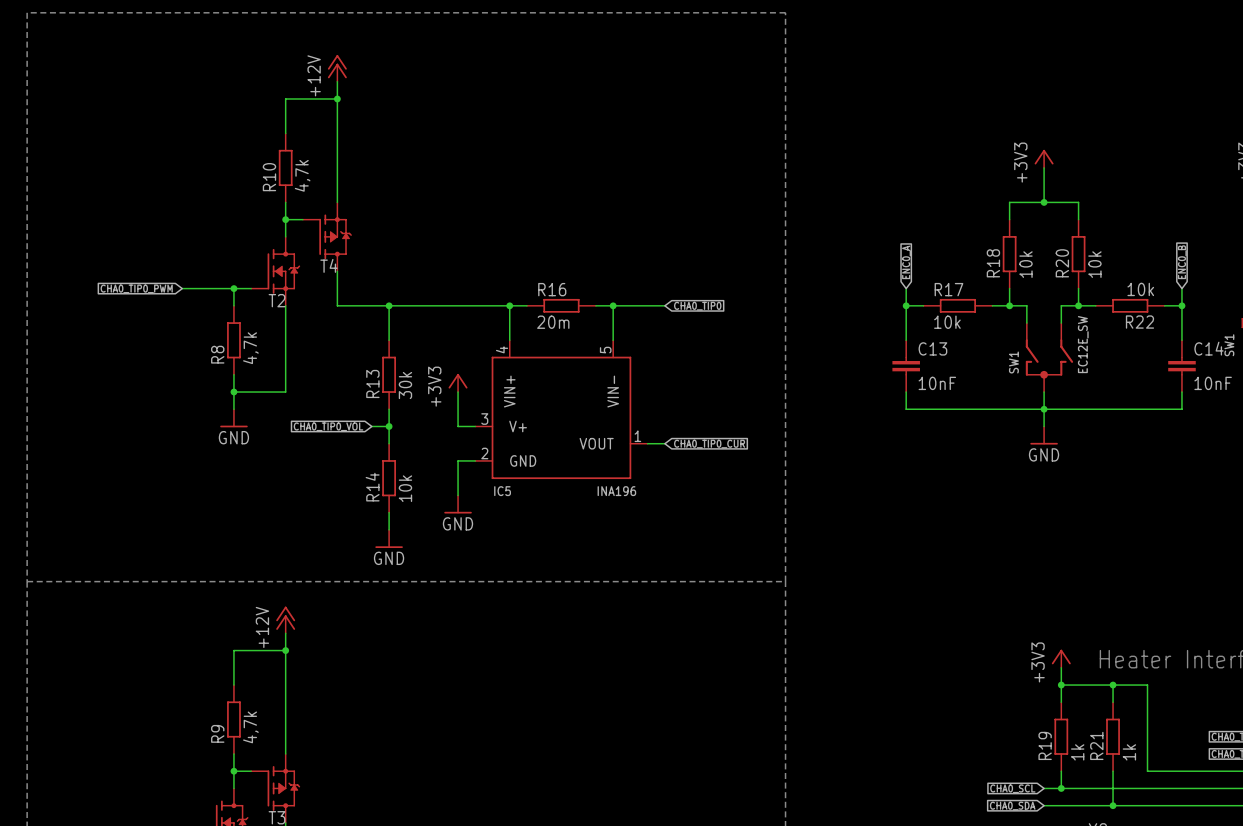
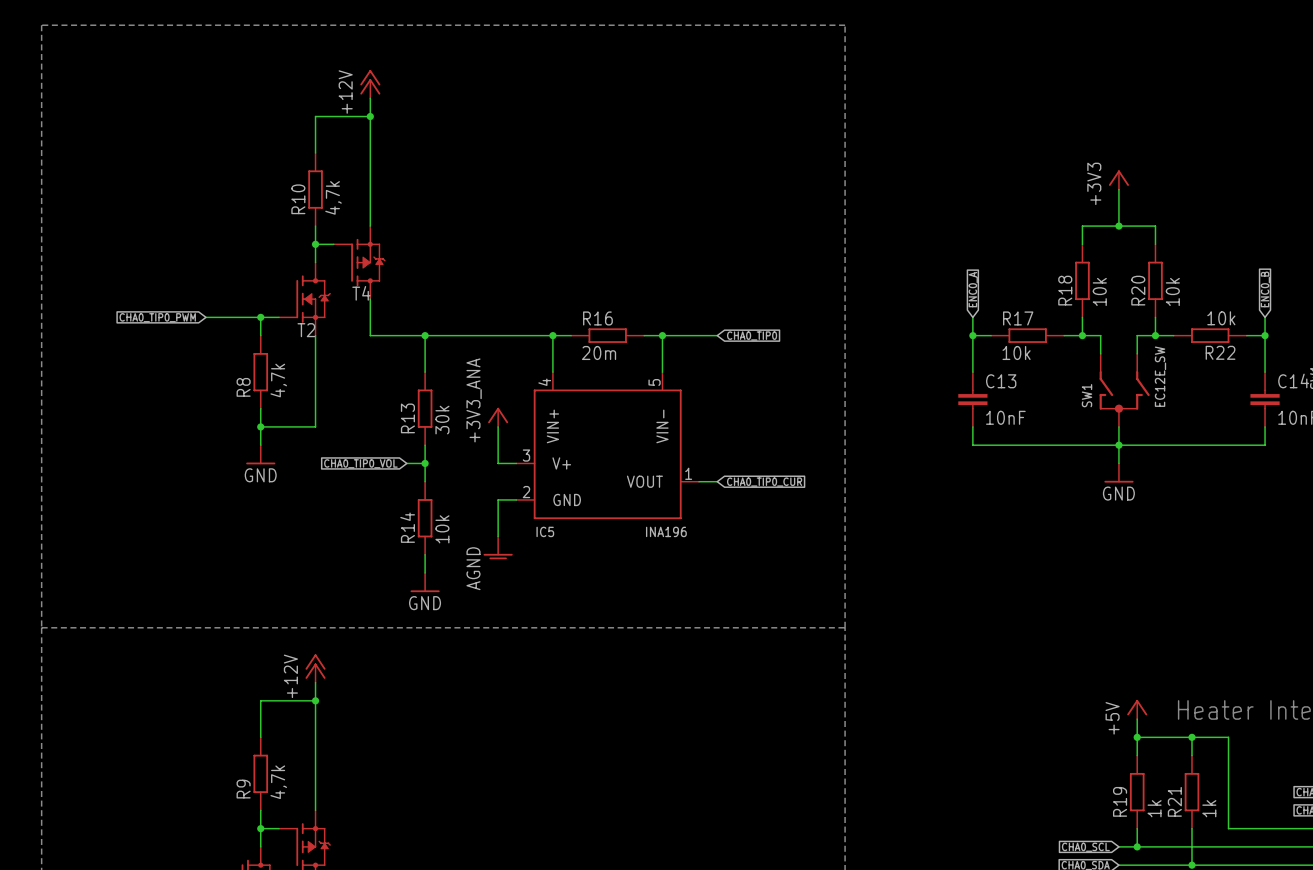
power symbol: +3V3 (458, 382) -> +3V3_ANA (498, 417)
power symbol: GND (458, 504) -> AGND (498, 547)
power symbol: +3V3 (1061, 658) -> +5V (1137, 709)

